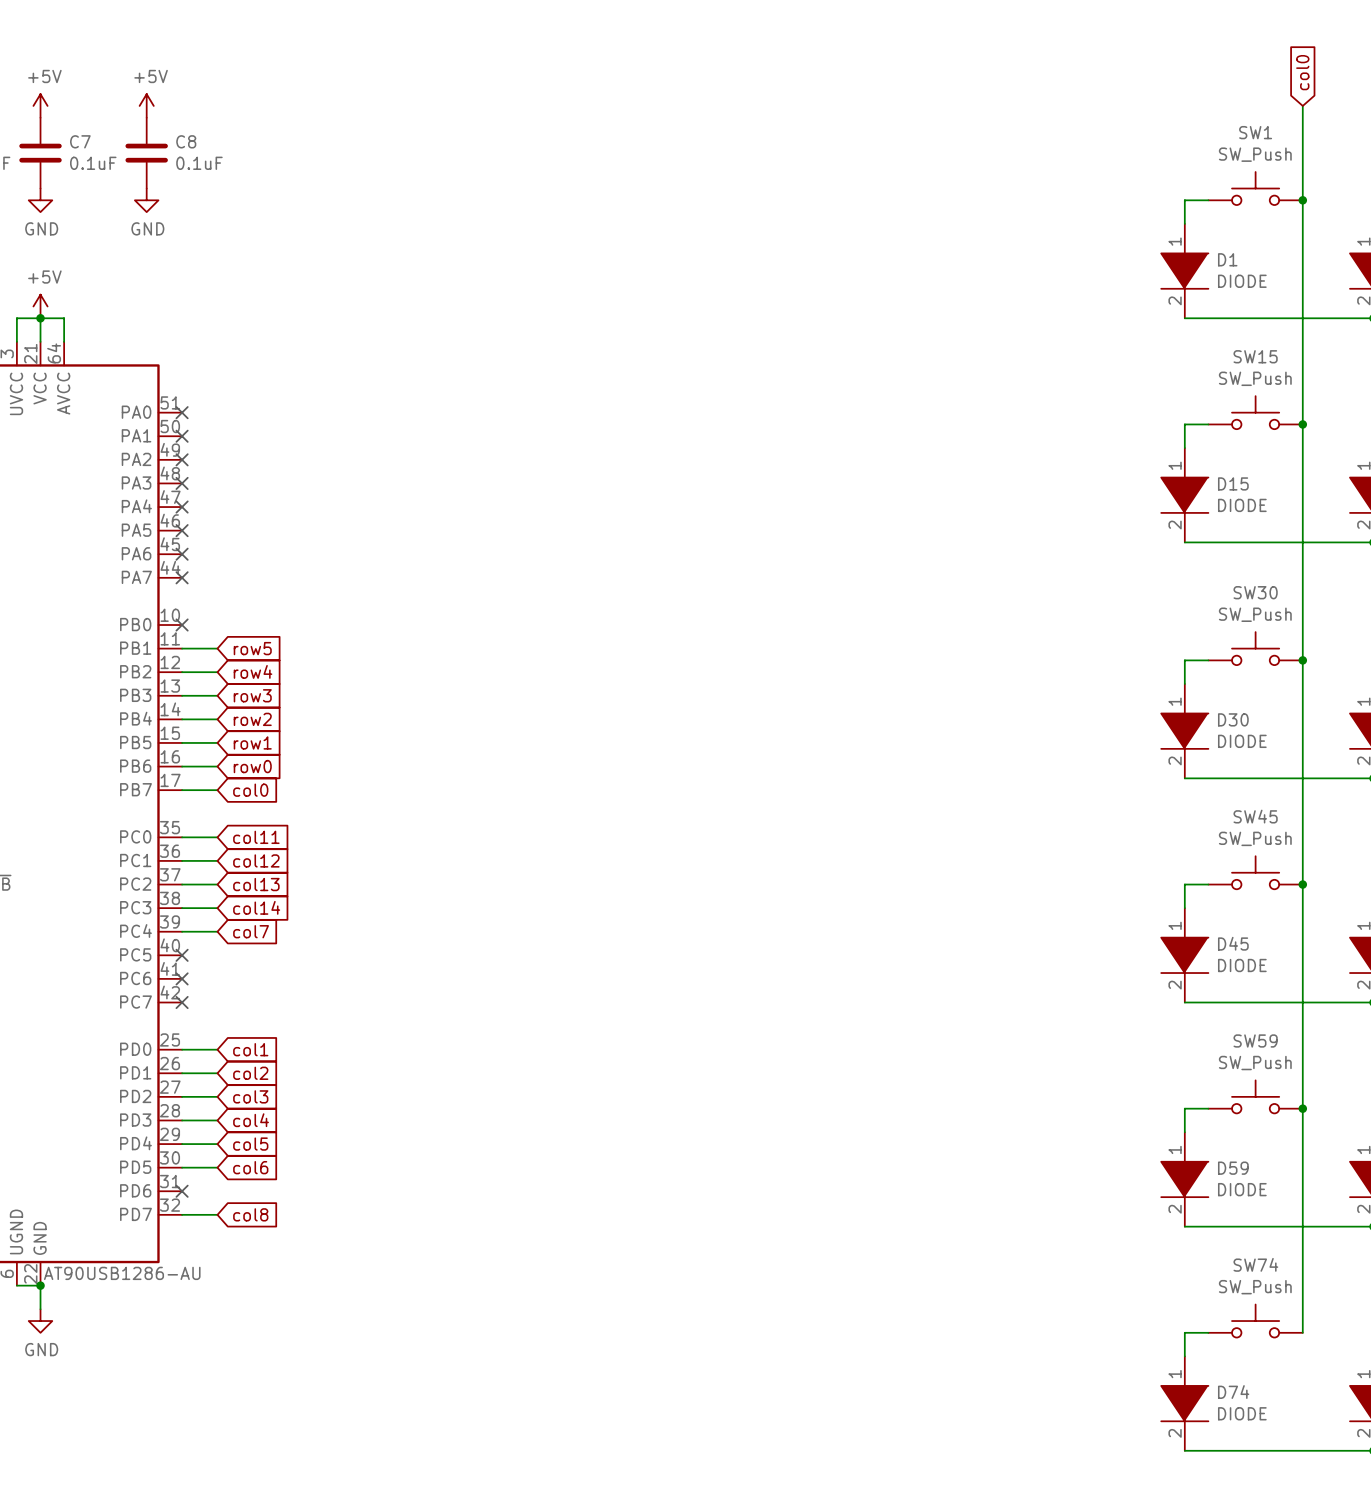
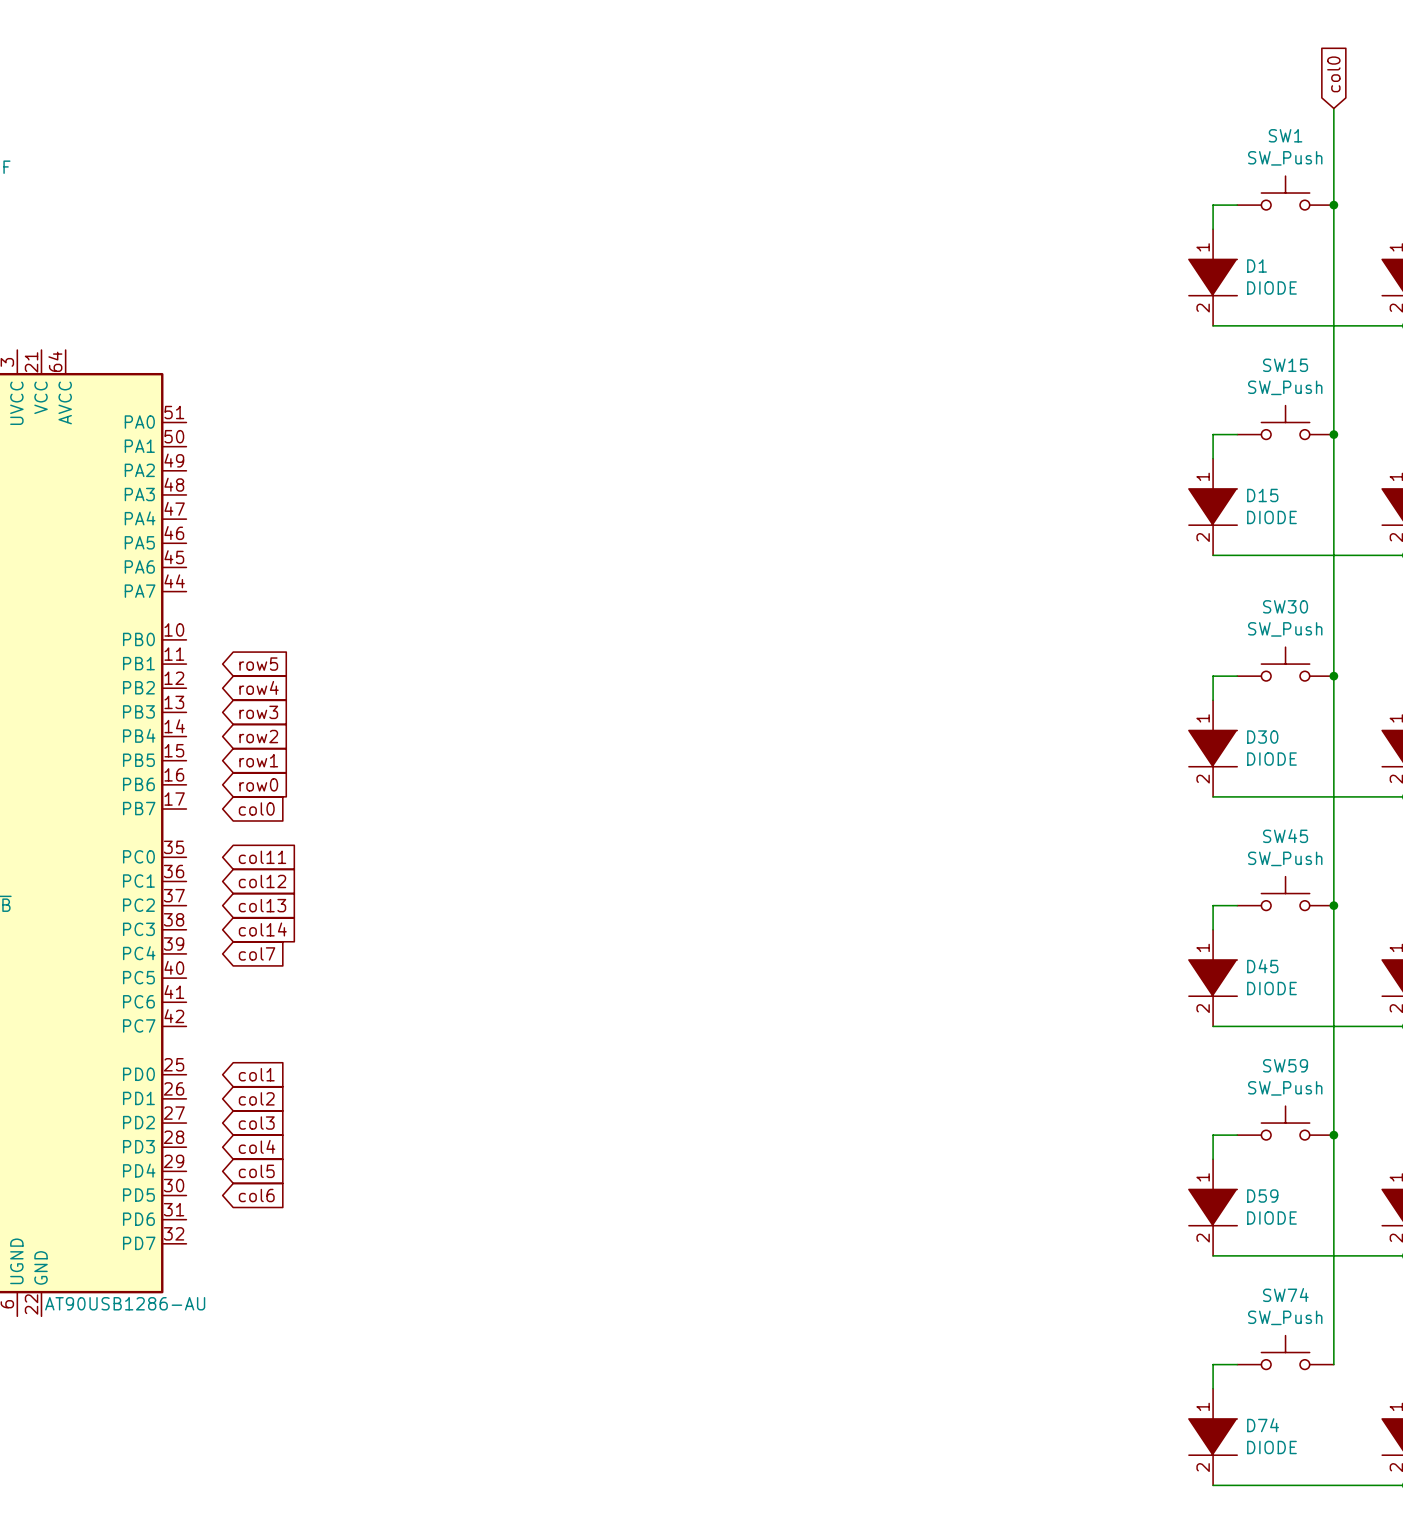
power symbol: +5V (40, 105) -> none
power symbol: +5V (146, 105) -> none
C7: 0.1uF (40, 153) -> none
C8: 0.1uF (146, 153) -> none
power symbol: GND (40, 200) -> none
power symbol: GND (146, 200) -> none
power symbol: +5V (40, 306) -> none
wire: (40, 318) (40, 341) -> none
junction: (40, 318) -> none
wire: (16, 341) (16, 318) (64, 318) (64, 341) -> none
no-connect mark: (182, 412) -> none
no-connect mark: (182, 436) -> none
no-connect mark: (182, 459) -> none
no-connect mark: (182, 483) -> none
no-connect mark: (182, 507) -> none
no-connect mark: (182, 530) -> none
no-connect mark: (182, 554) -> none
no-connect mark: (182, 577) -> none
no-connect mark: (182, 625) -> none
wire: (182, 648) (217, 648) -> none
wire: (182, 672) (217, 672) -> none
wire: (182, 695) (217, 695) -> none
wire: (182, 719) (217, 719) -> none
wire: (182, 742) (217, 742) -> none
wire: (182, 766) (217, 766) -> none
wire: (182, 790) (217, 790) -> none
wire: (182, 837) (217, 837) -> none
wire: (182, 860) (217, 860) -> none
wire: (182, 884) (217, 884) -> none
wire: (182, 908) (217, 908) -> none
wire: (182, 931) (217, 931) -> none
no-connect mark: (182, 955) -> none
no-connect mark: (182, 978) -> none
no-connect mark: (182, 1002) -> none
wire: (182, 1049) (217, 1049) -> none
wire: (182, 1073) (217, 1073) -> none
wire: (182, 1096) (217, 1096) -> none
wire: (182, 1120) (217, 1120) -> none
wire: (182, 1144) (217, 1144) -> none
wire: (182, 1167) (217, 1167) -> none
no-connect mark: (182, 1191) -> none
wire: (182, 1214) (217, 1214) -> none
global label: col8 (250, 1214) -> none
wire: (16, 1285) (40, 1285) (40, 1309) -> none
junction: (40, 1285) -> none
power symbol: GND (40, 1321) -> none

